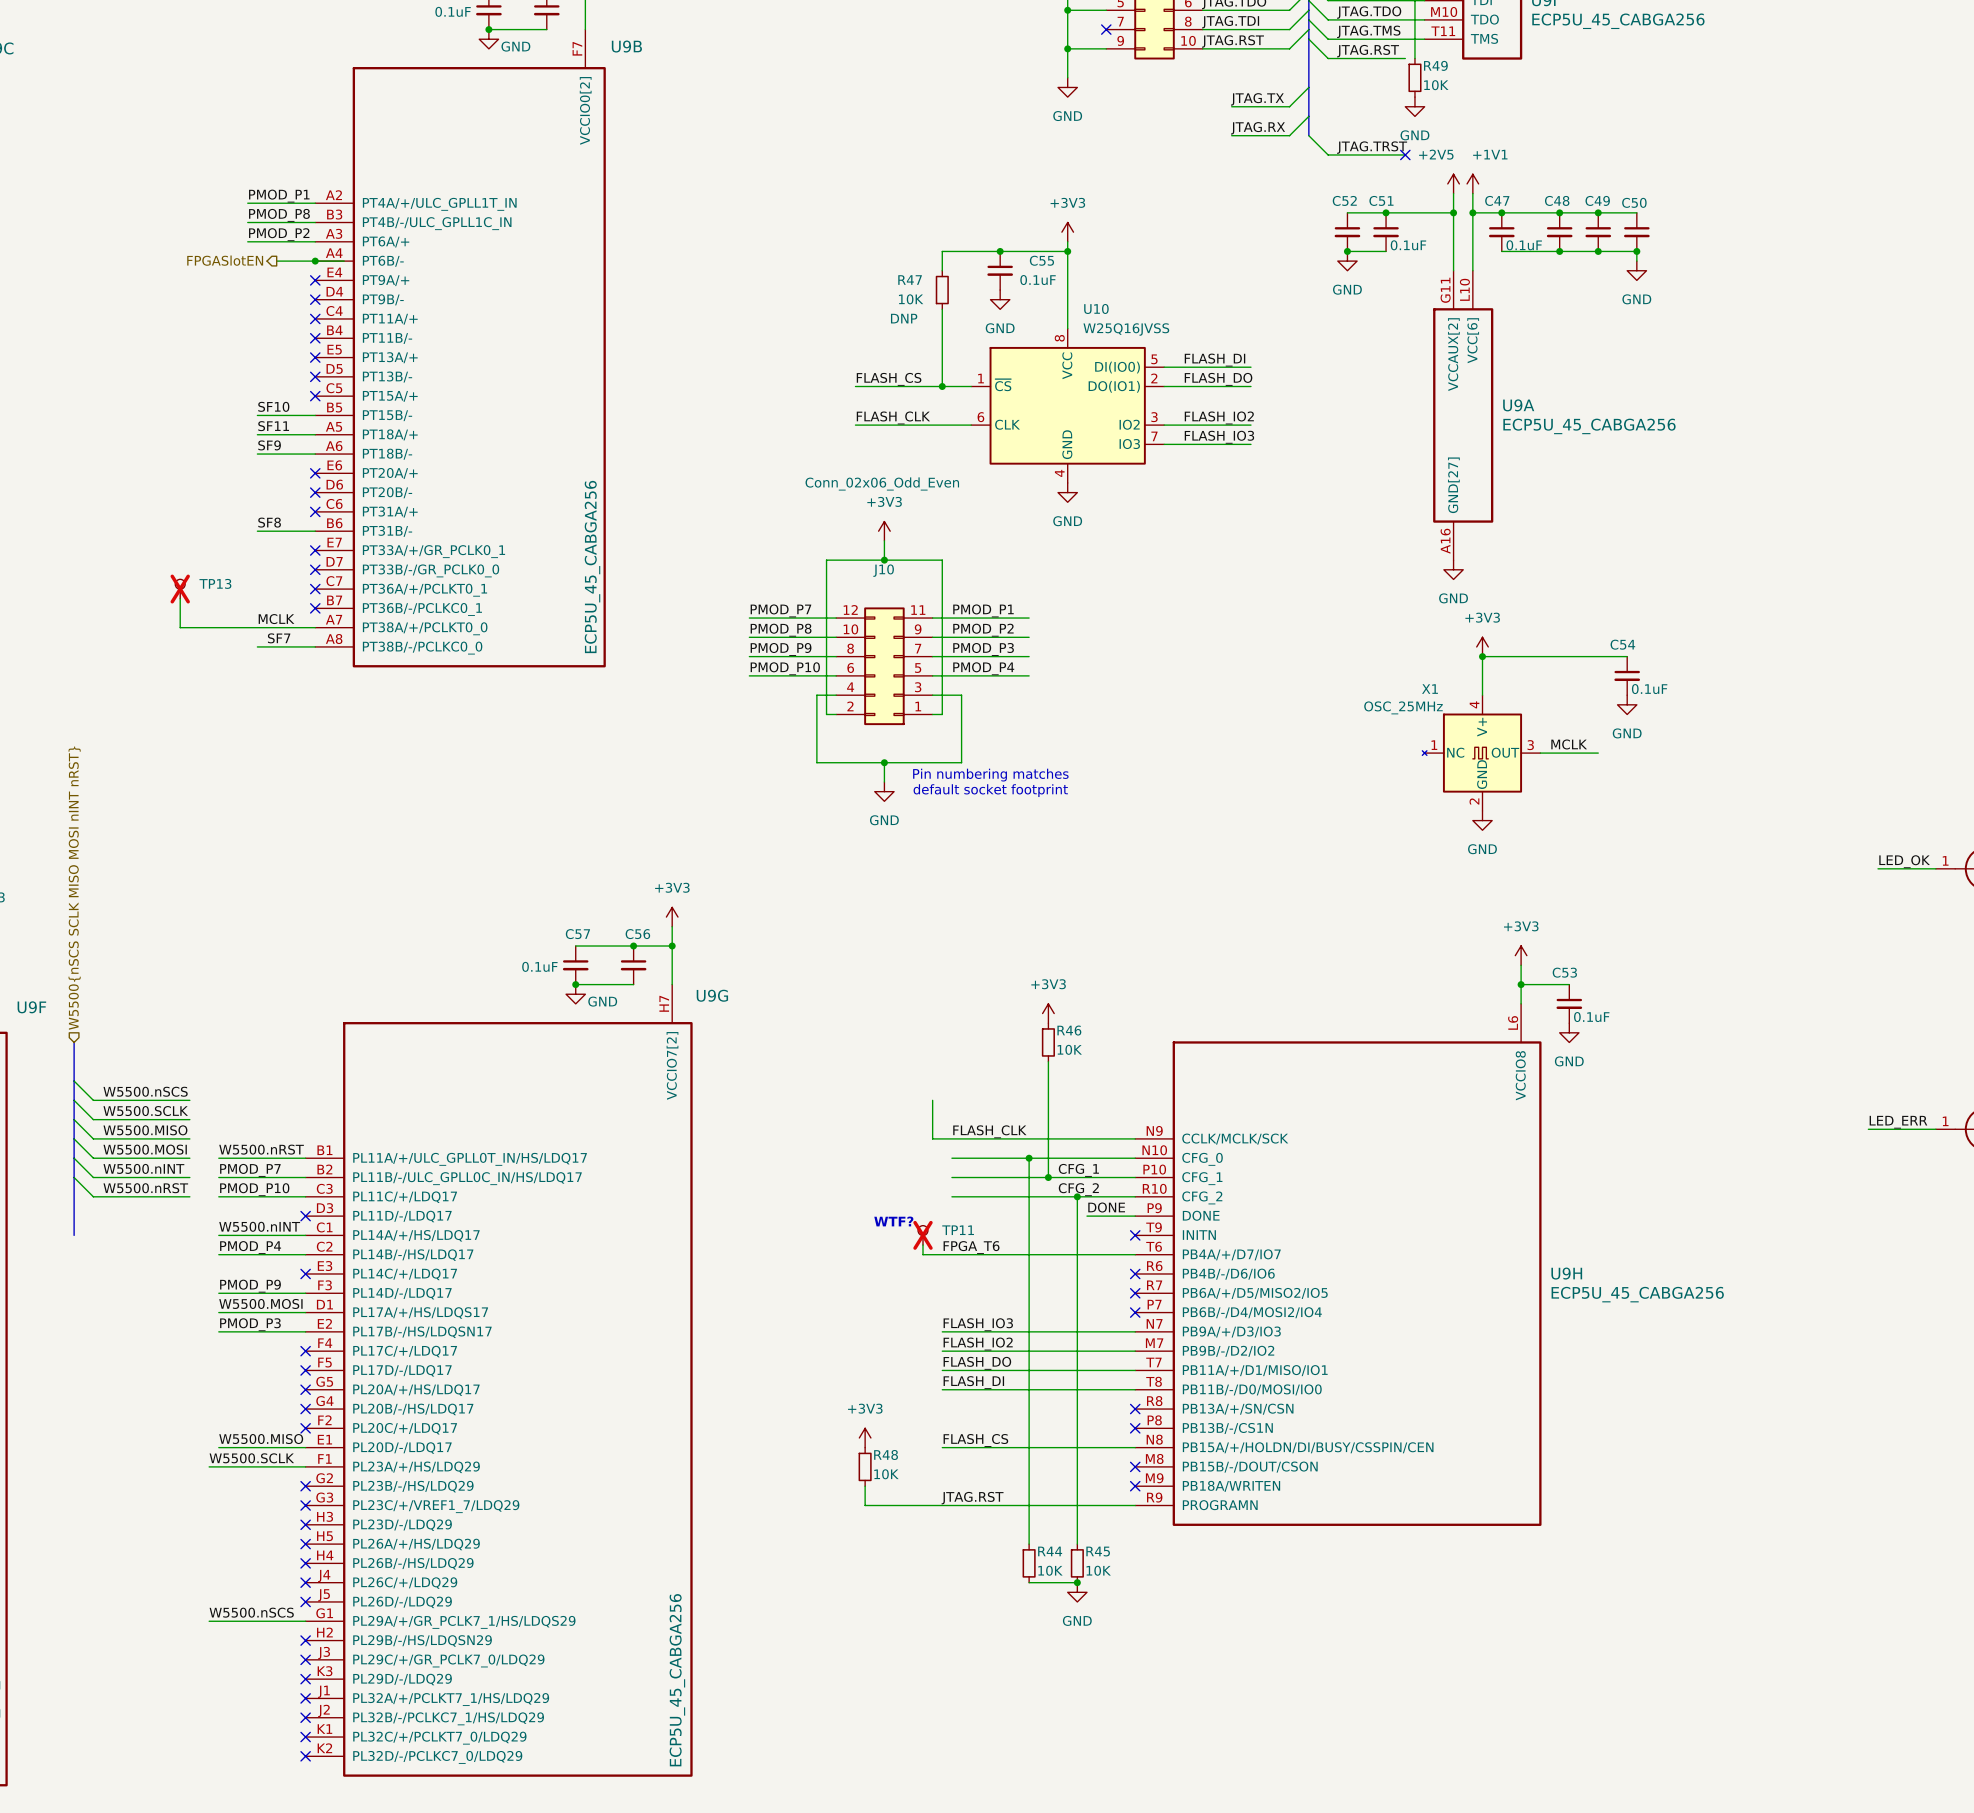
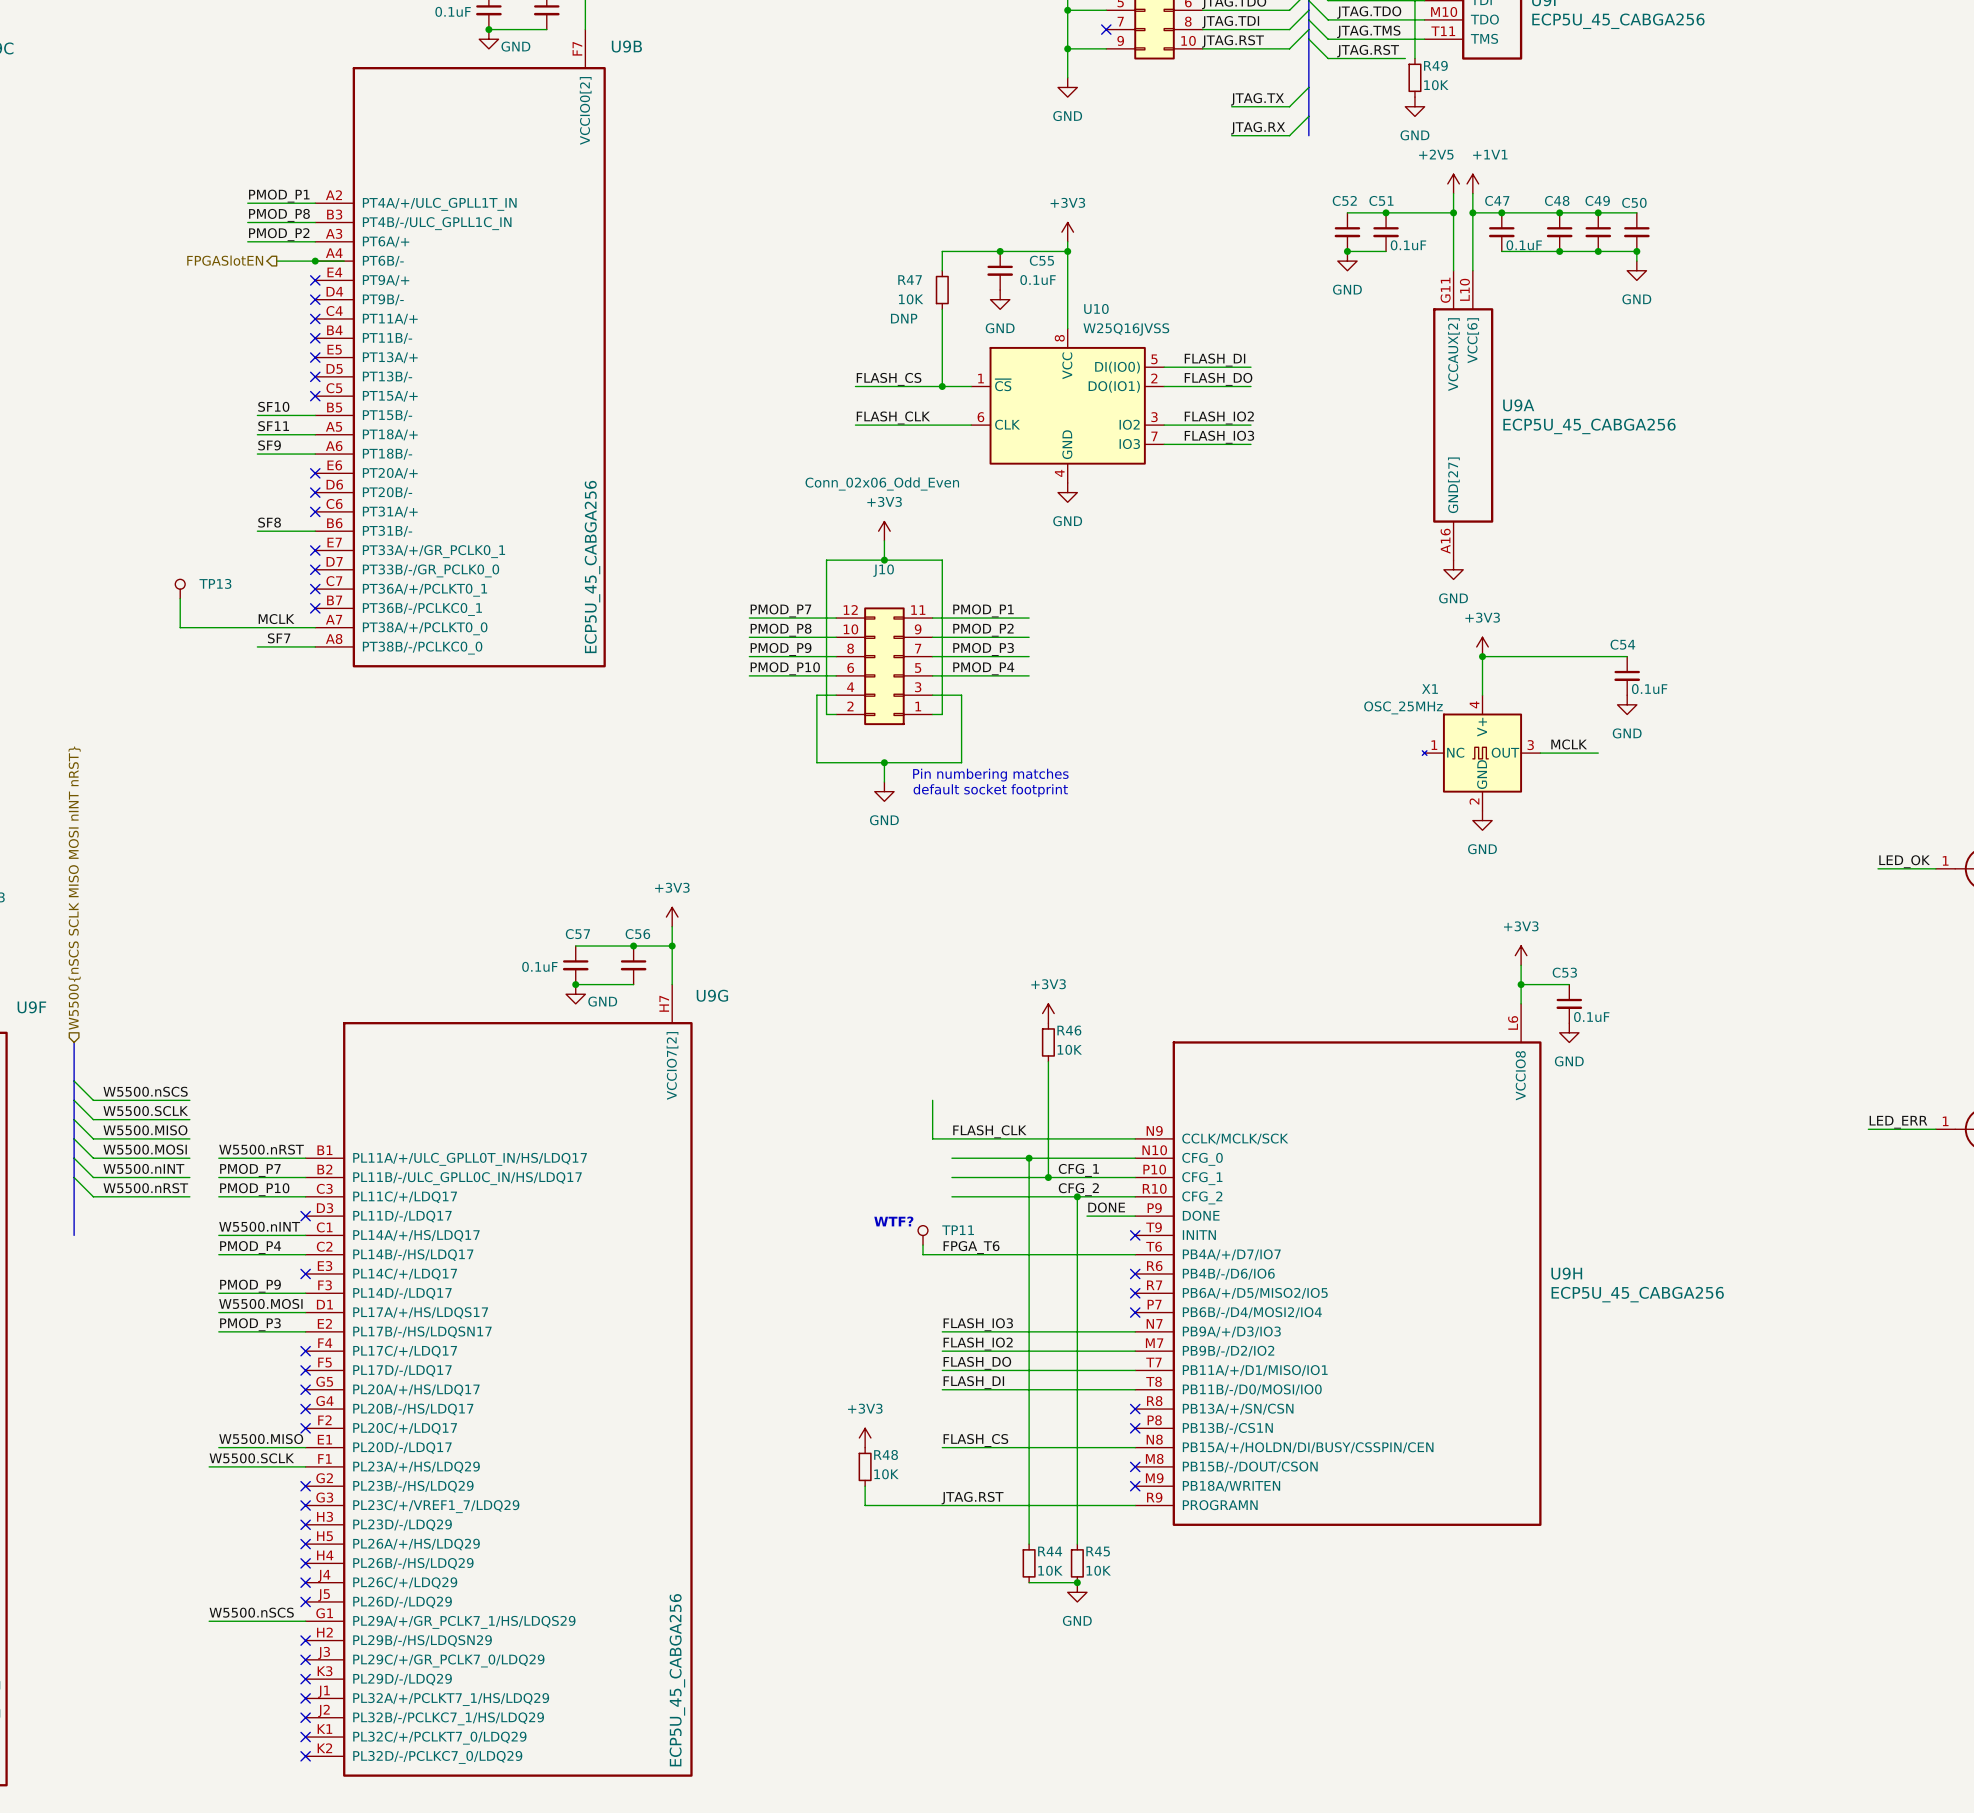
wire: (1308, 135) (1328, 154) (1405, 154) -> none
label: JTAG.TRST (1372, 147) -> none
no-connect mark: (1405, 154) -> none
TP13 do-not-place cross: (180, 589) -> none
TP11 do-not-place cross: (923, 1235) -> none

